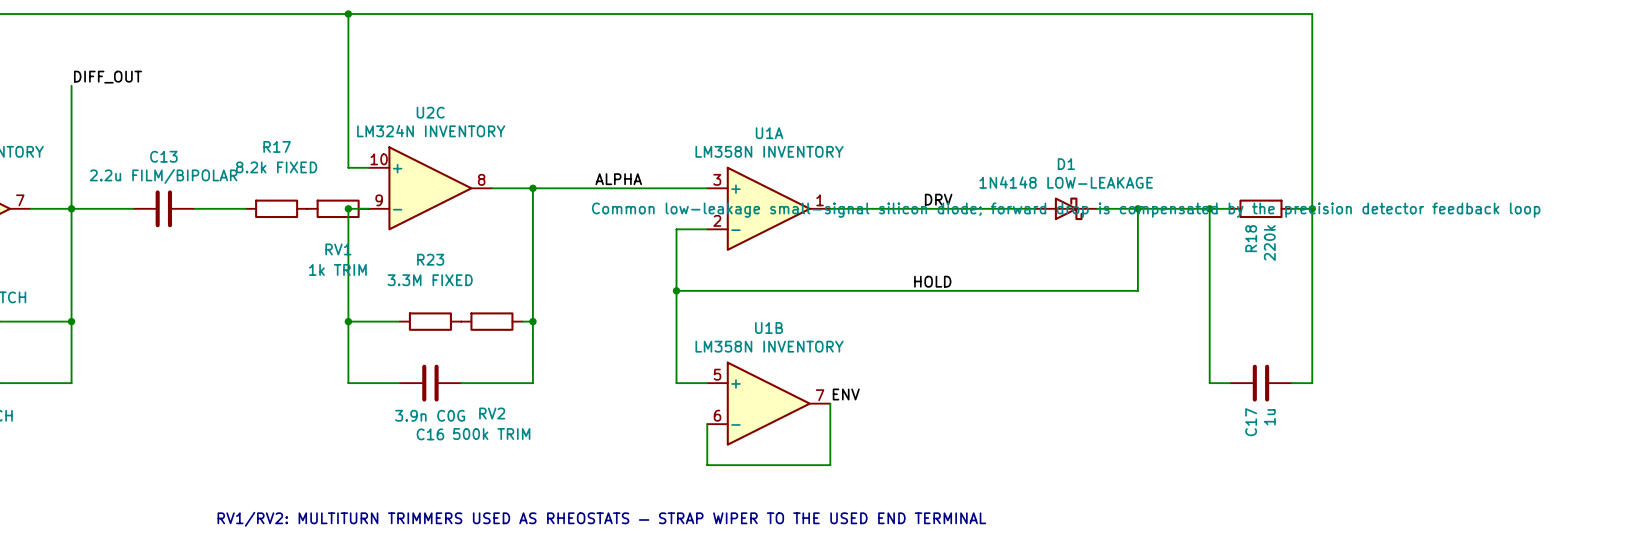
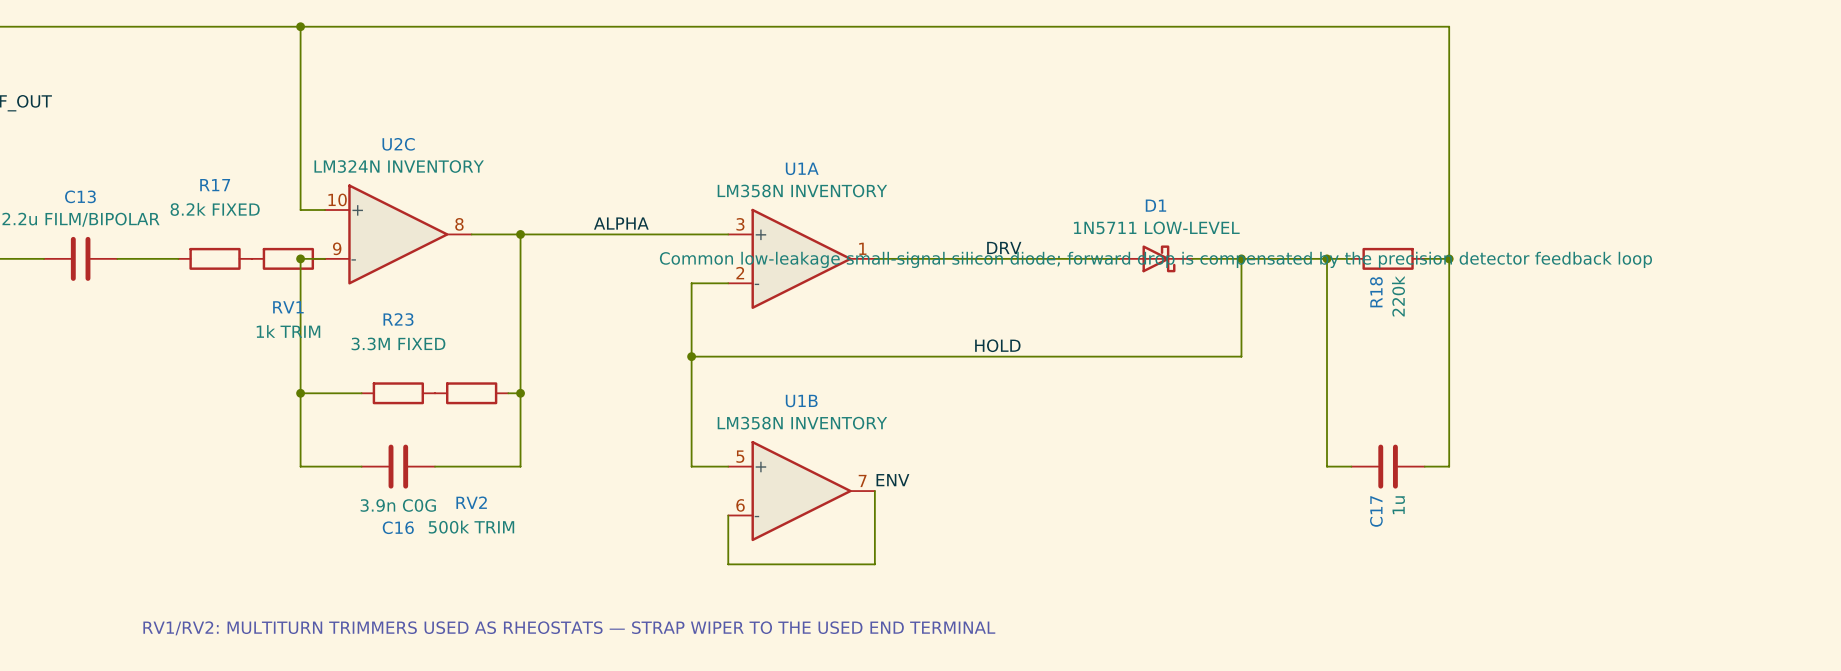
D1 value: 1N4148 LOW-LEAKAGE (1066, 182) -> 1N5711 LOW-LEVEL (1156, 227)

